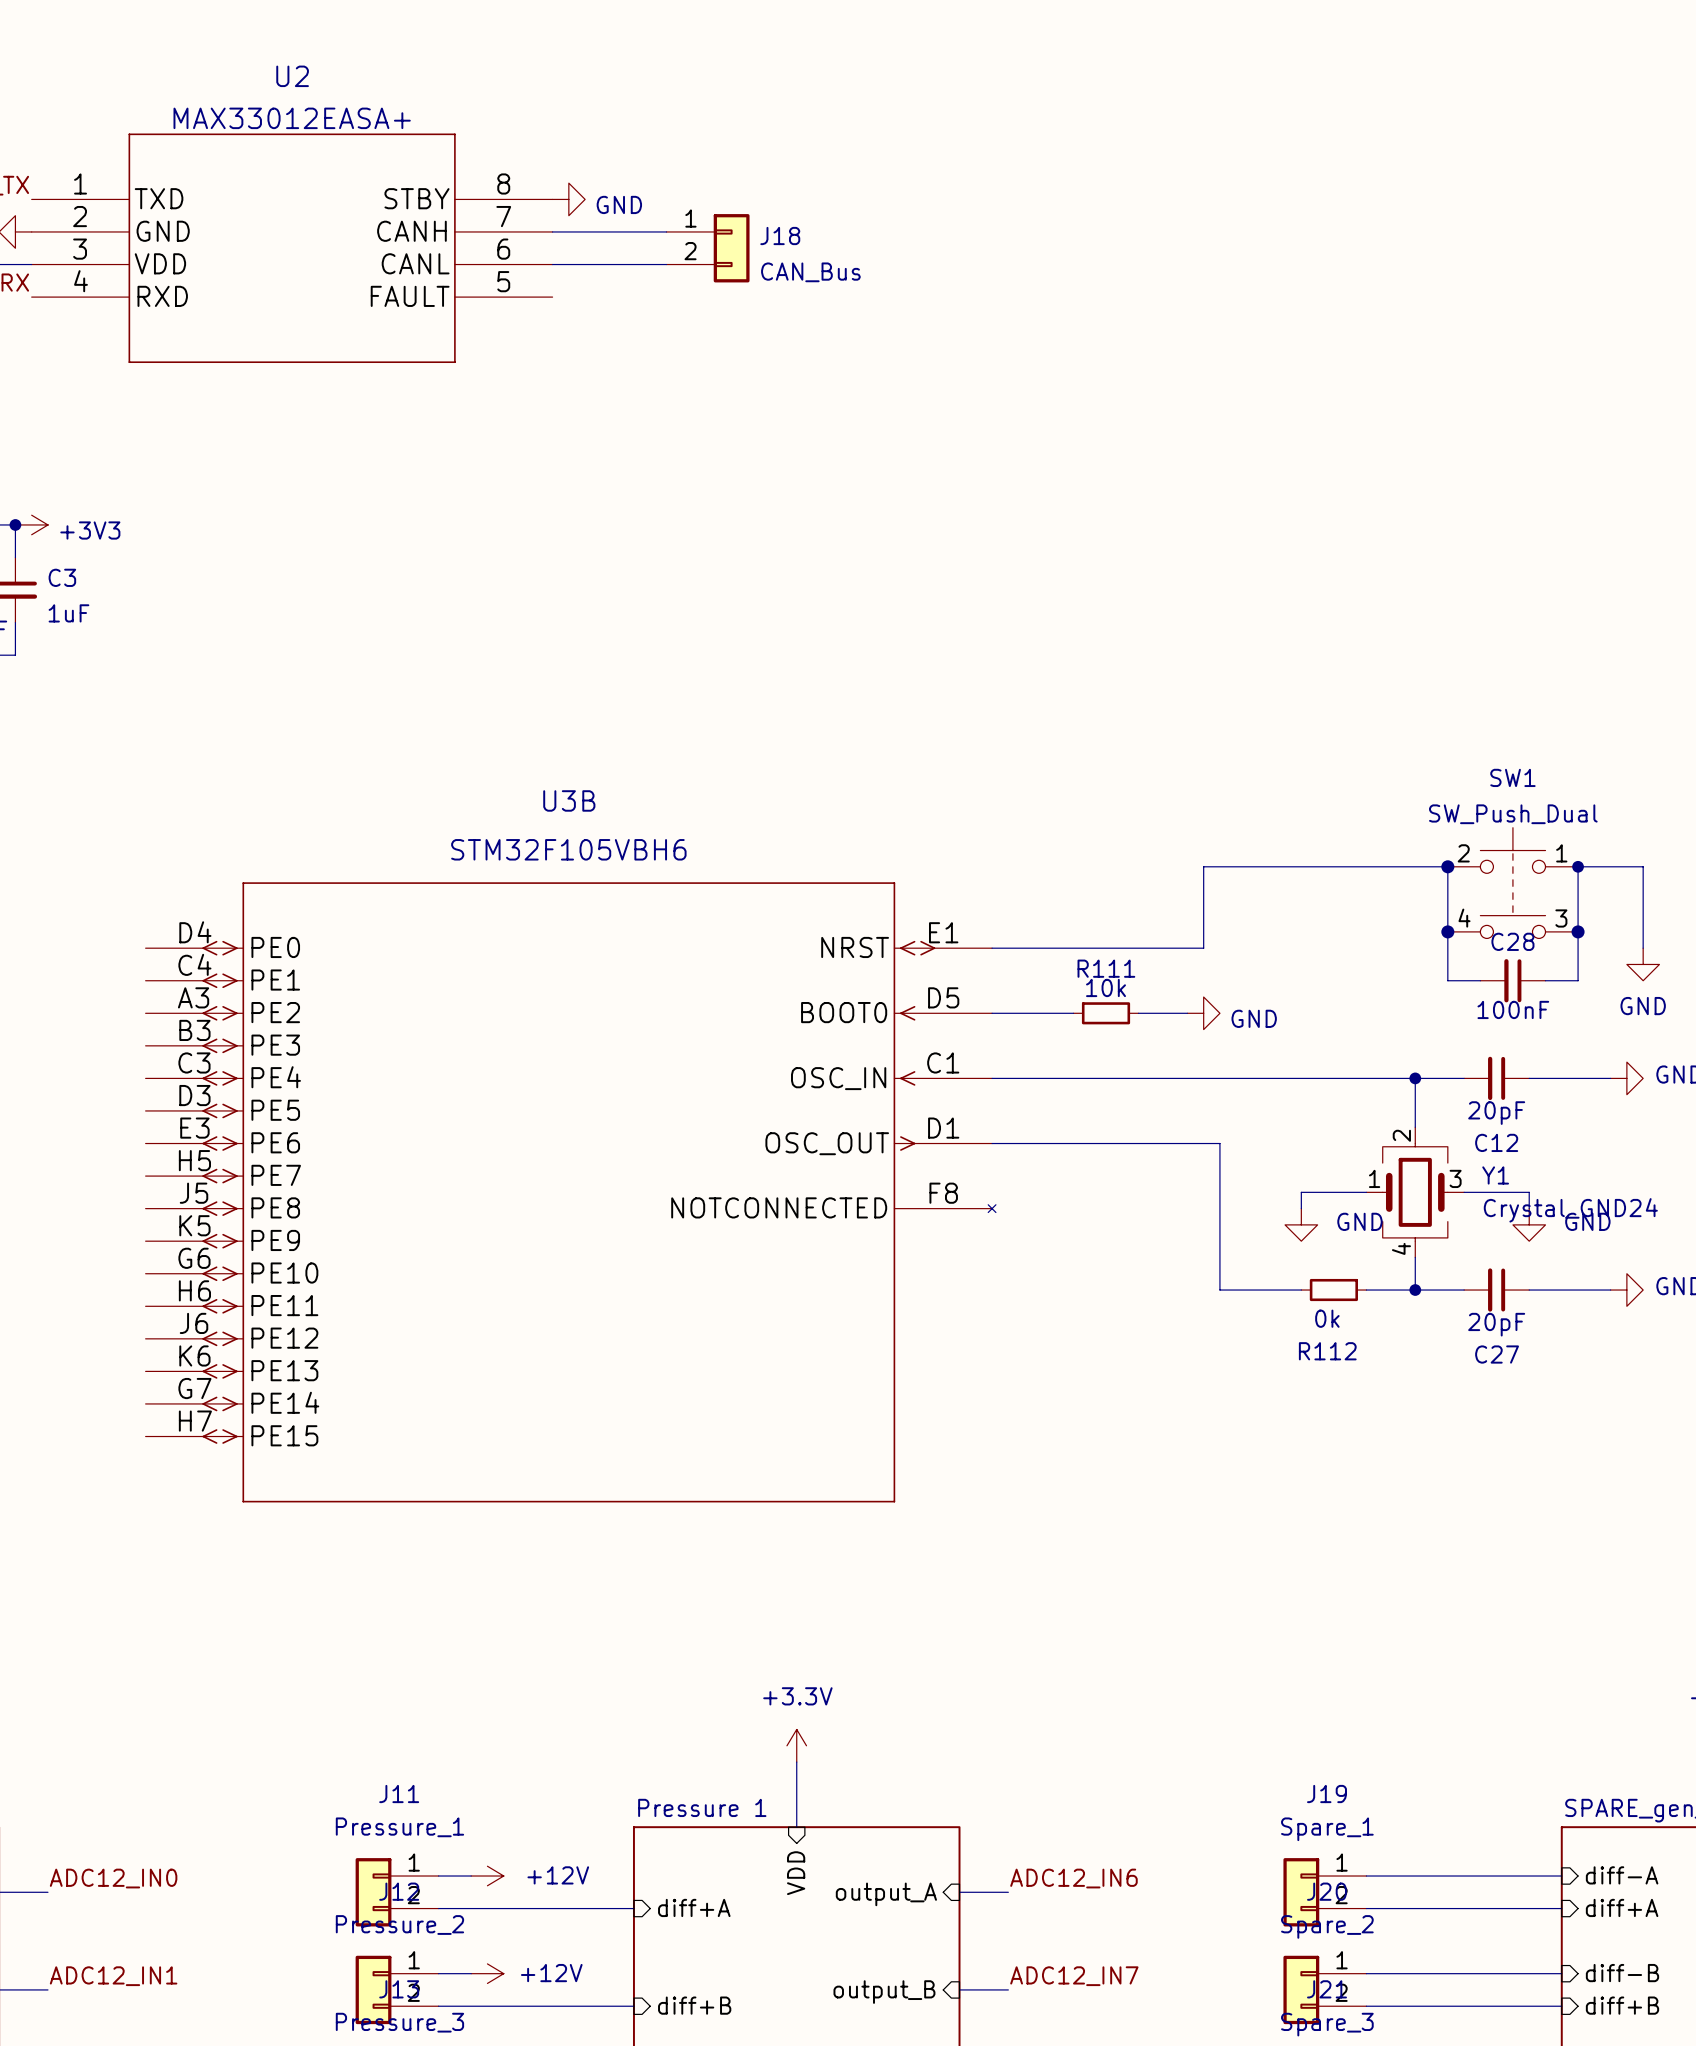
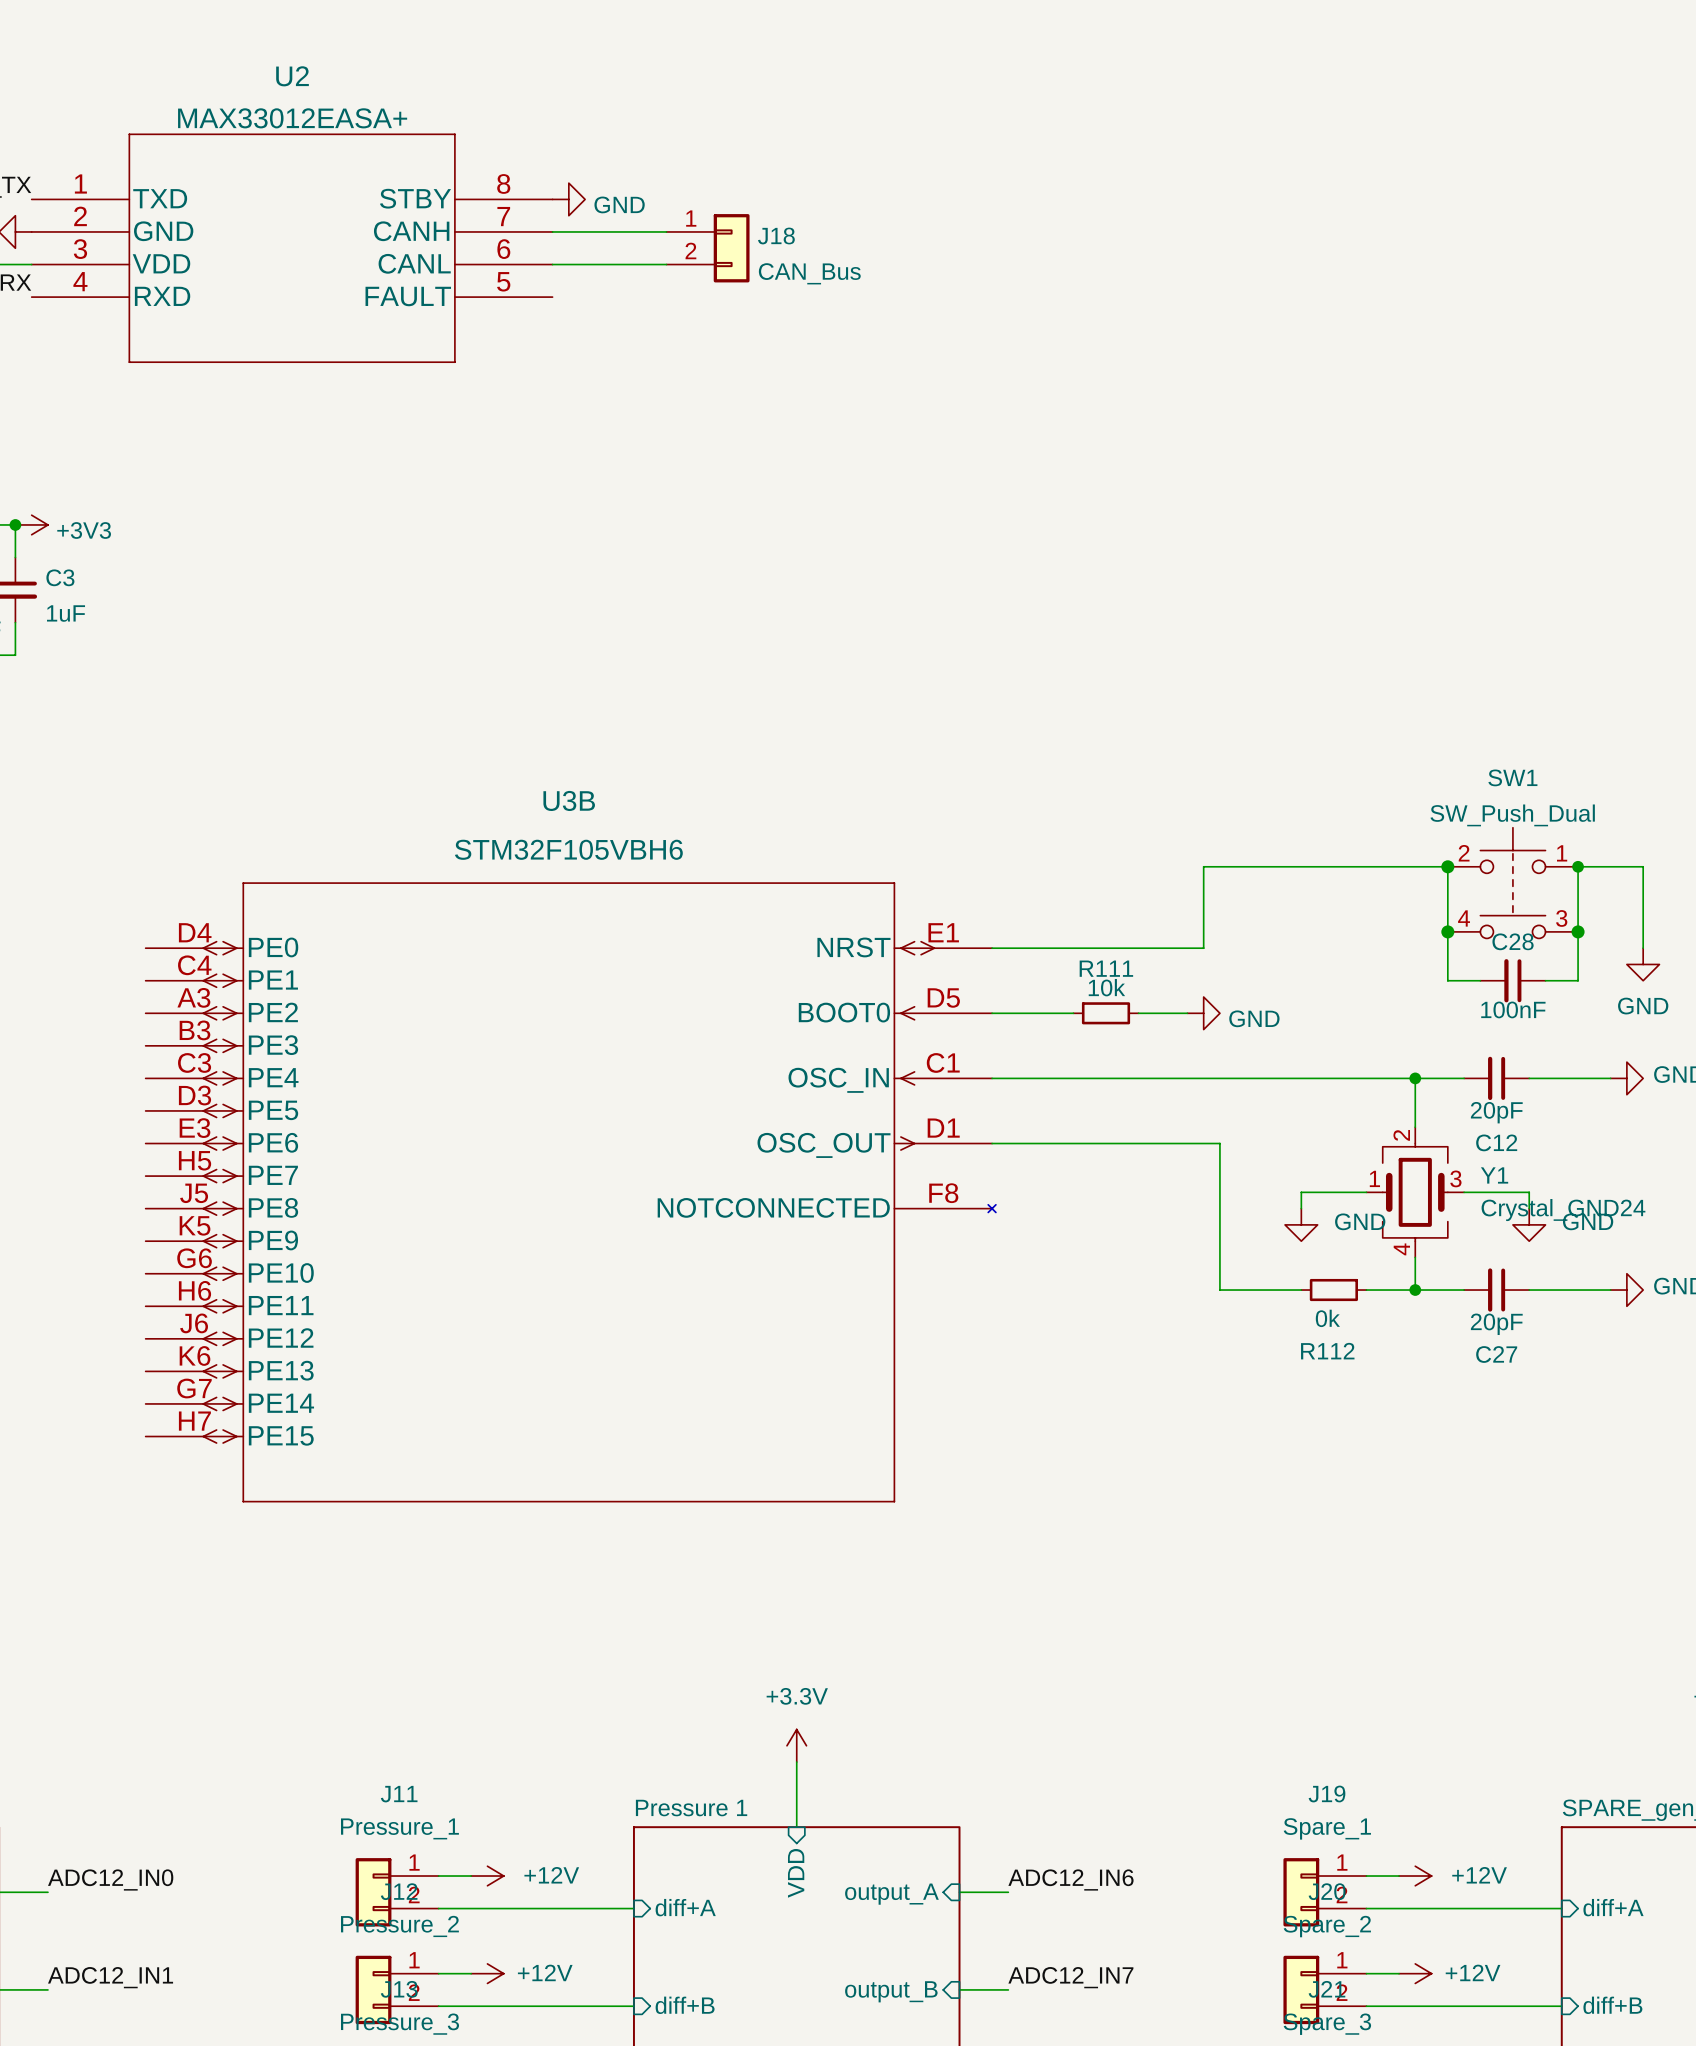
sheet pin: diff-A (1622, 1875) -> none
wire: (1399, 1876) (1561, 1876) -> none
power symbol: none -> +12V (1415, 1876)
wire: (1399, 1973) (1561, 1973) -> none
power symbol: none -> +12V (1415, 1973)
sheet pin: diff-B (1622, 1973) -> none

